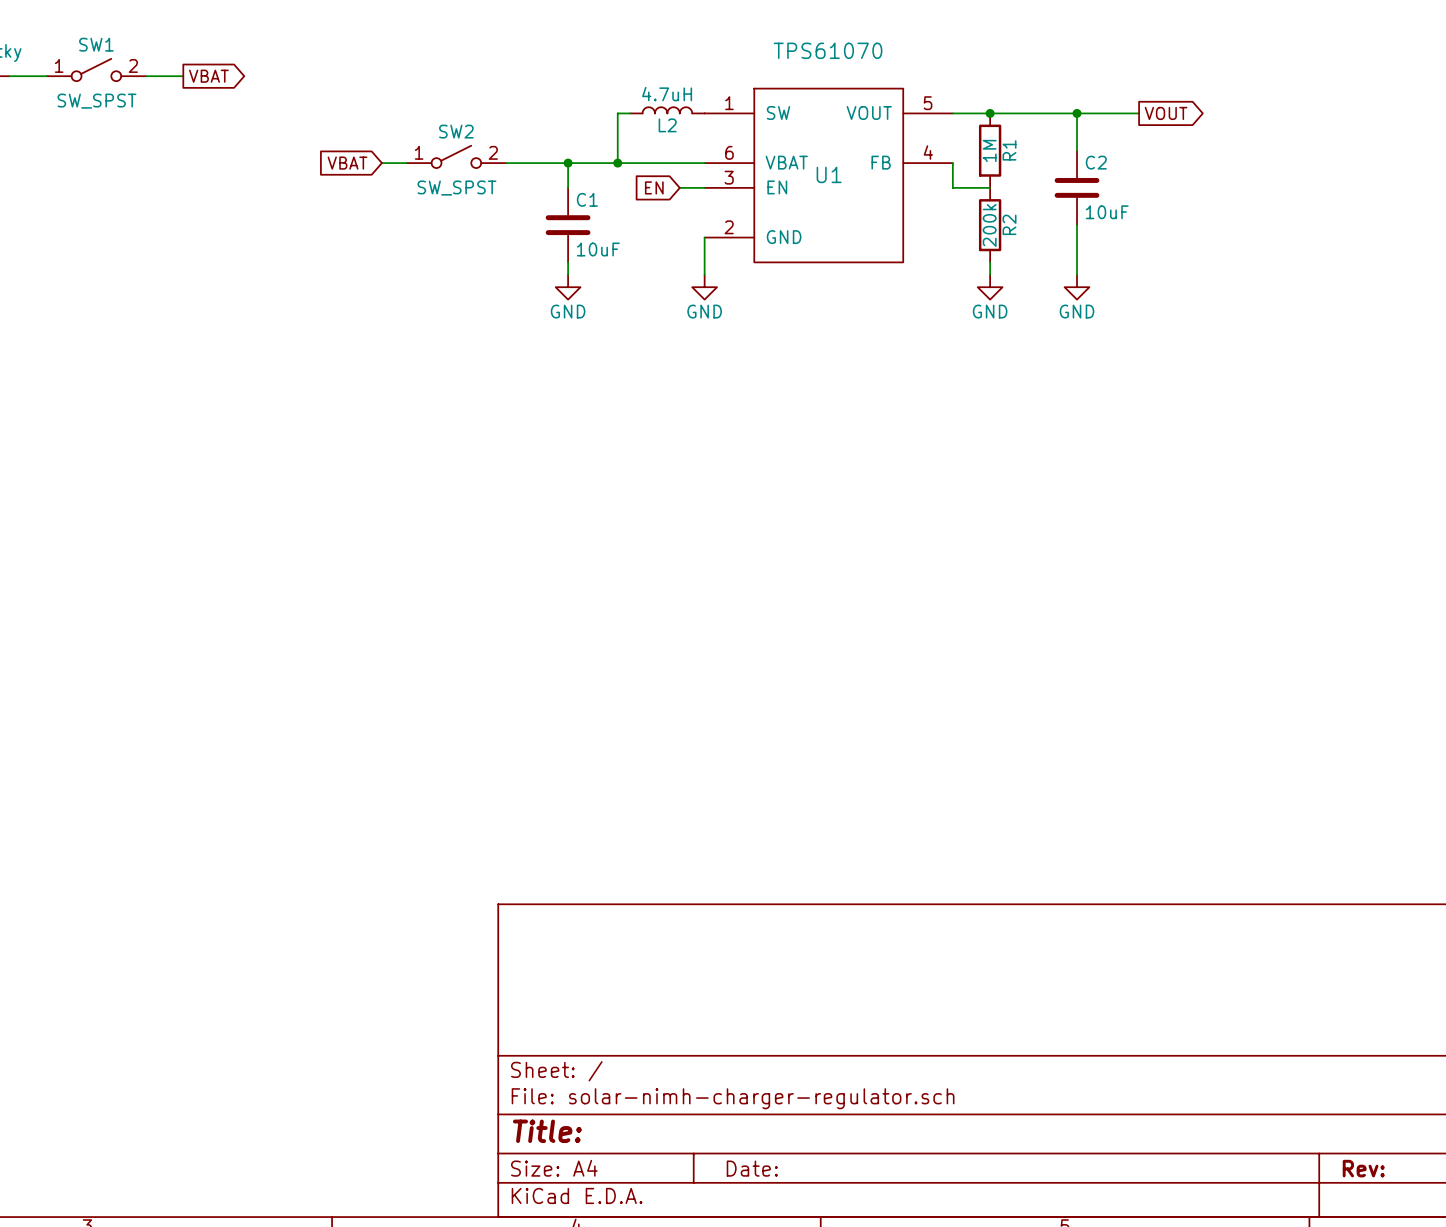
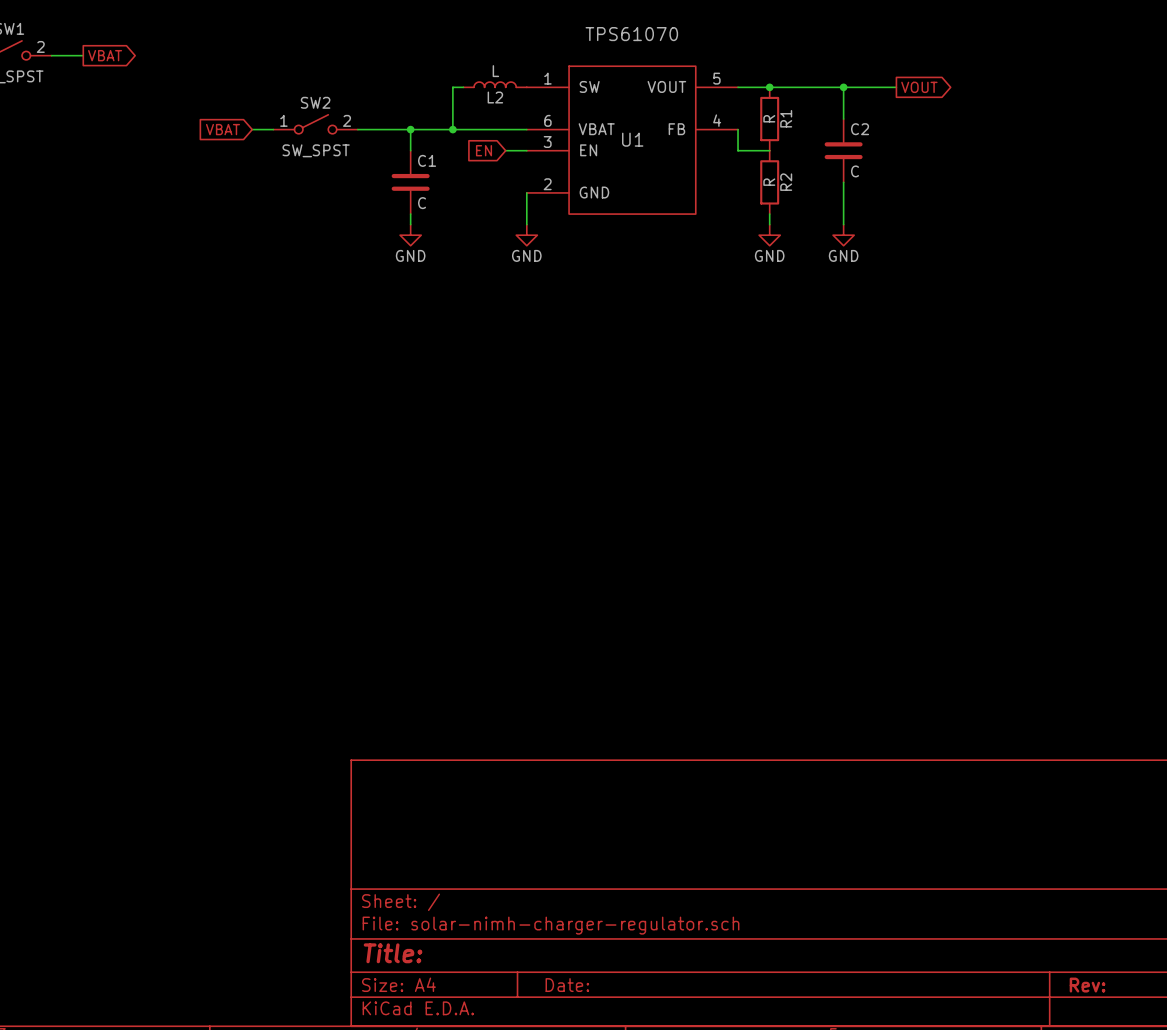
L2 value: 4.7uH (667, 94) -> L (495, 71)
R1 value: 1M (989, 150) -> R (769, 118)
C2 value: 10uF (1107, 212) -> C (855, 171)
R2 value: 200k (989, 225) -> R (769, 182)
C1 value: 10uF (598, 249) -> C (422, 203)

